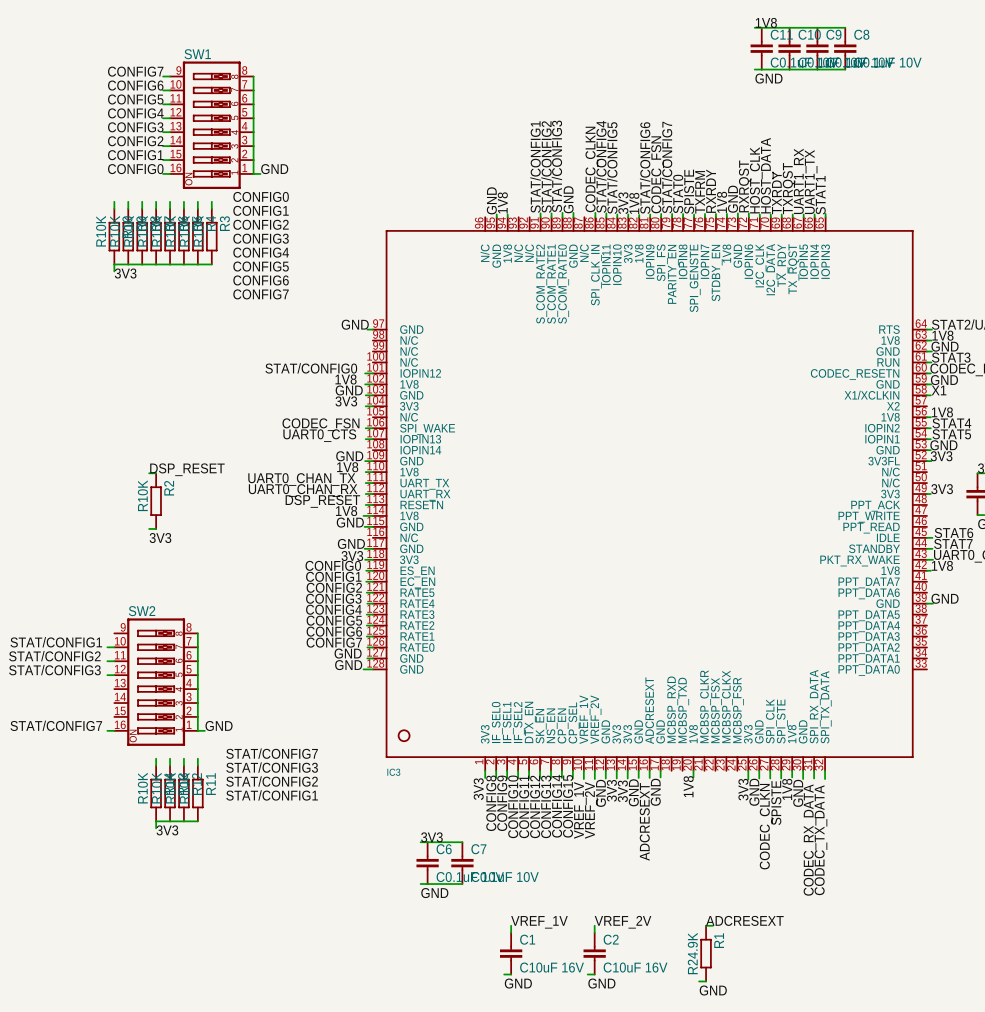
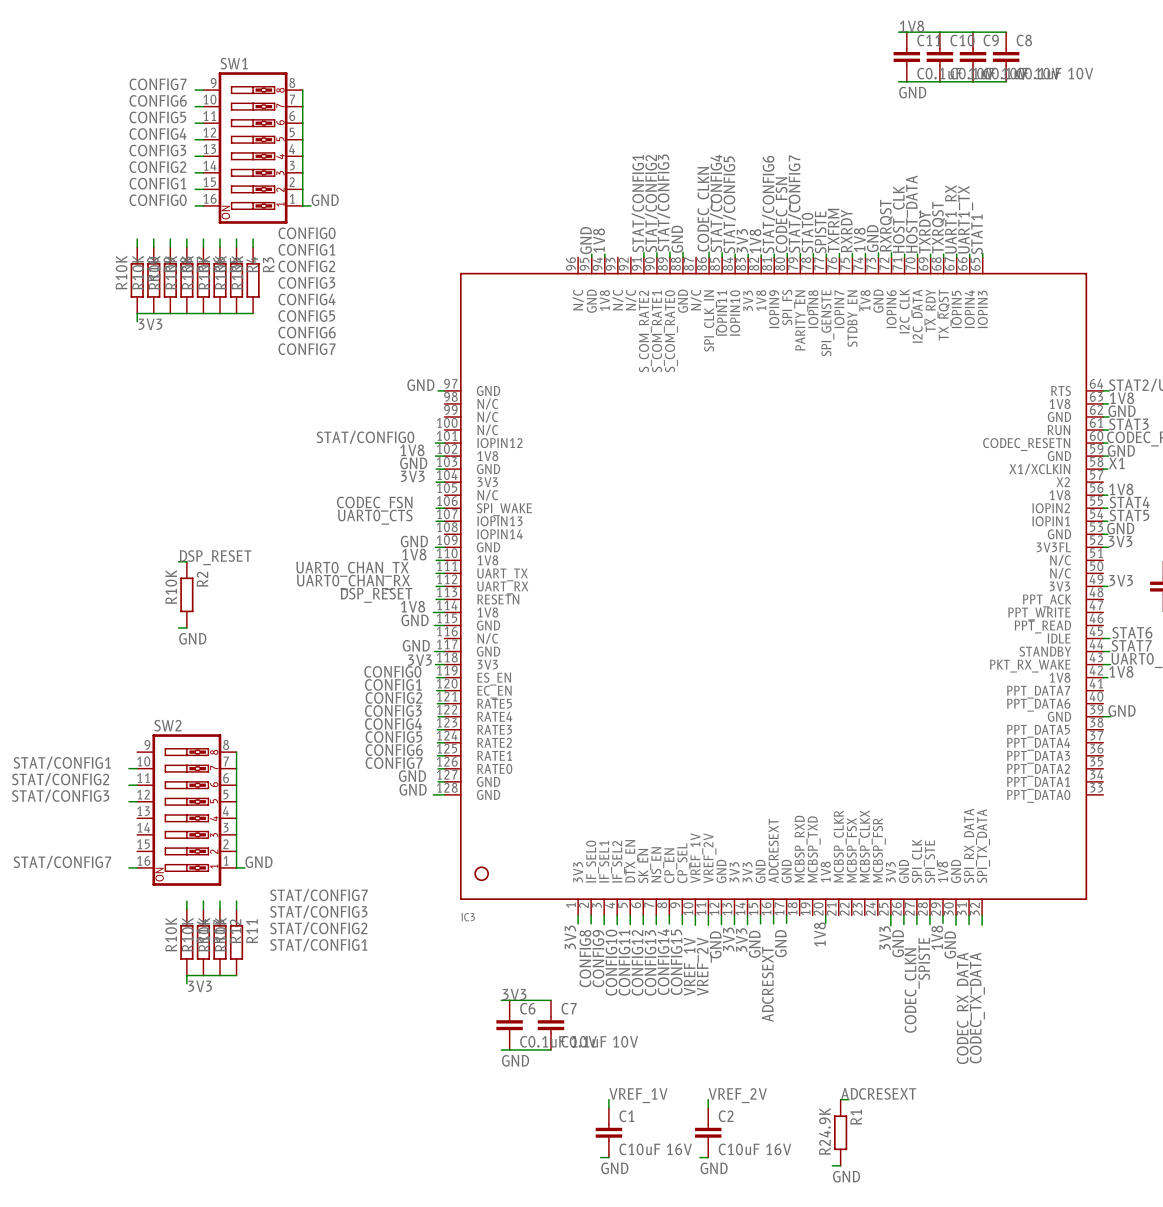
label: 3V3 (160, 538) -> GND (192, 638)

